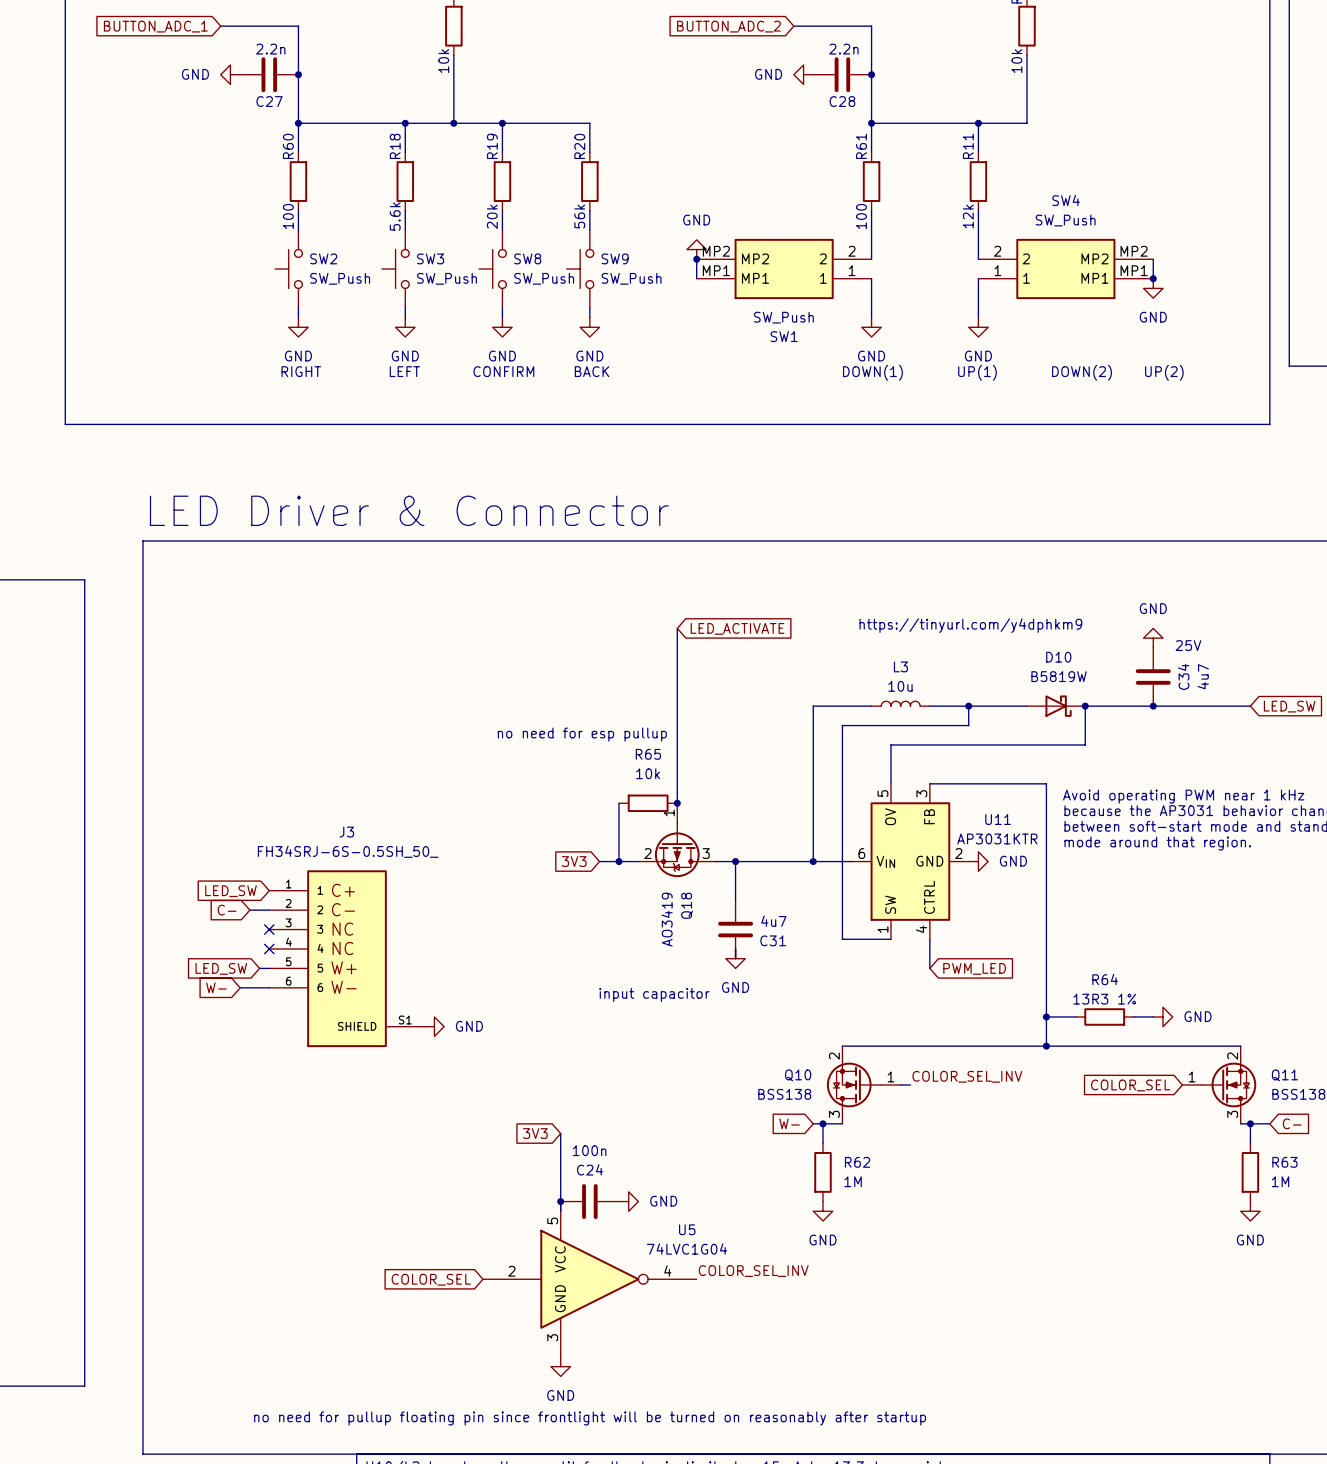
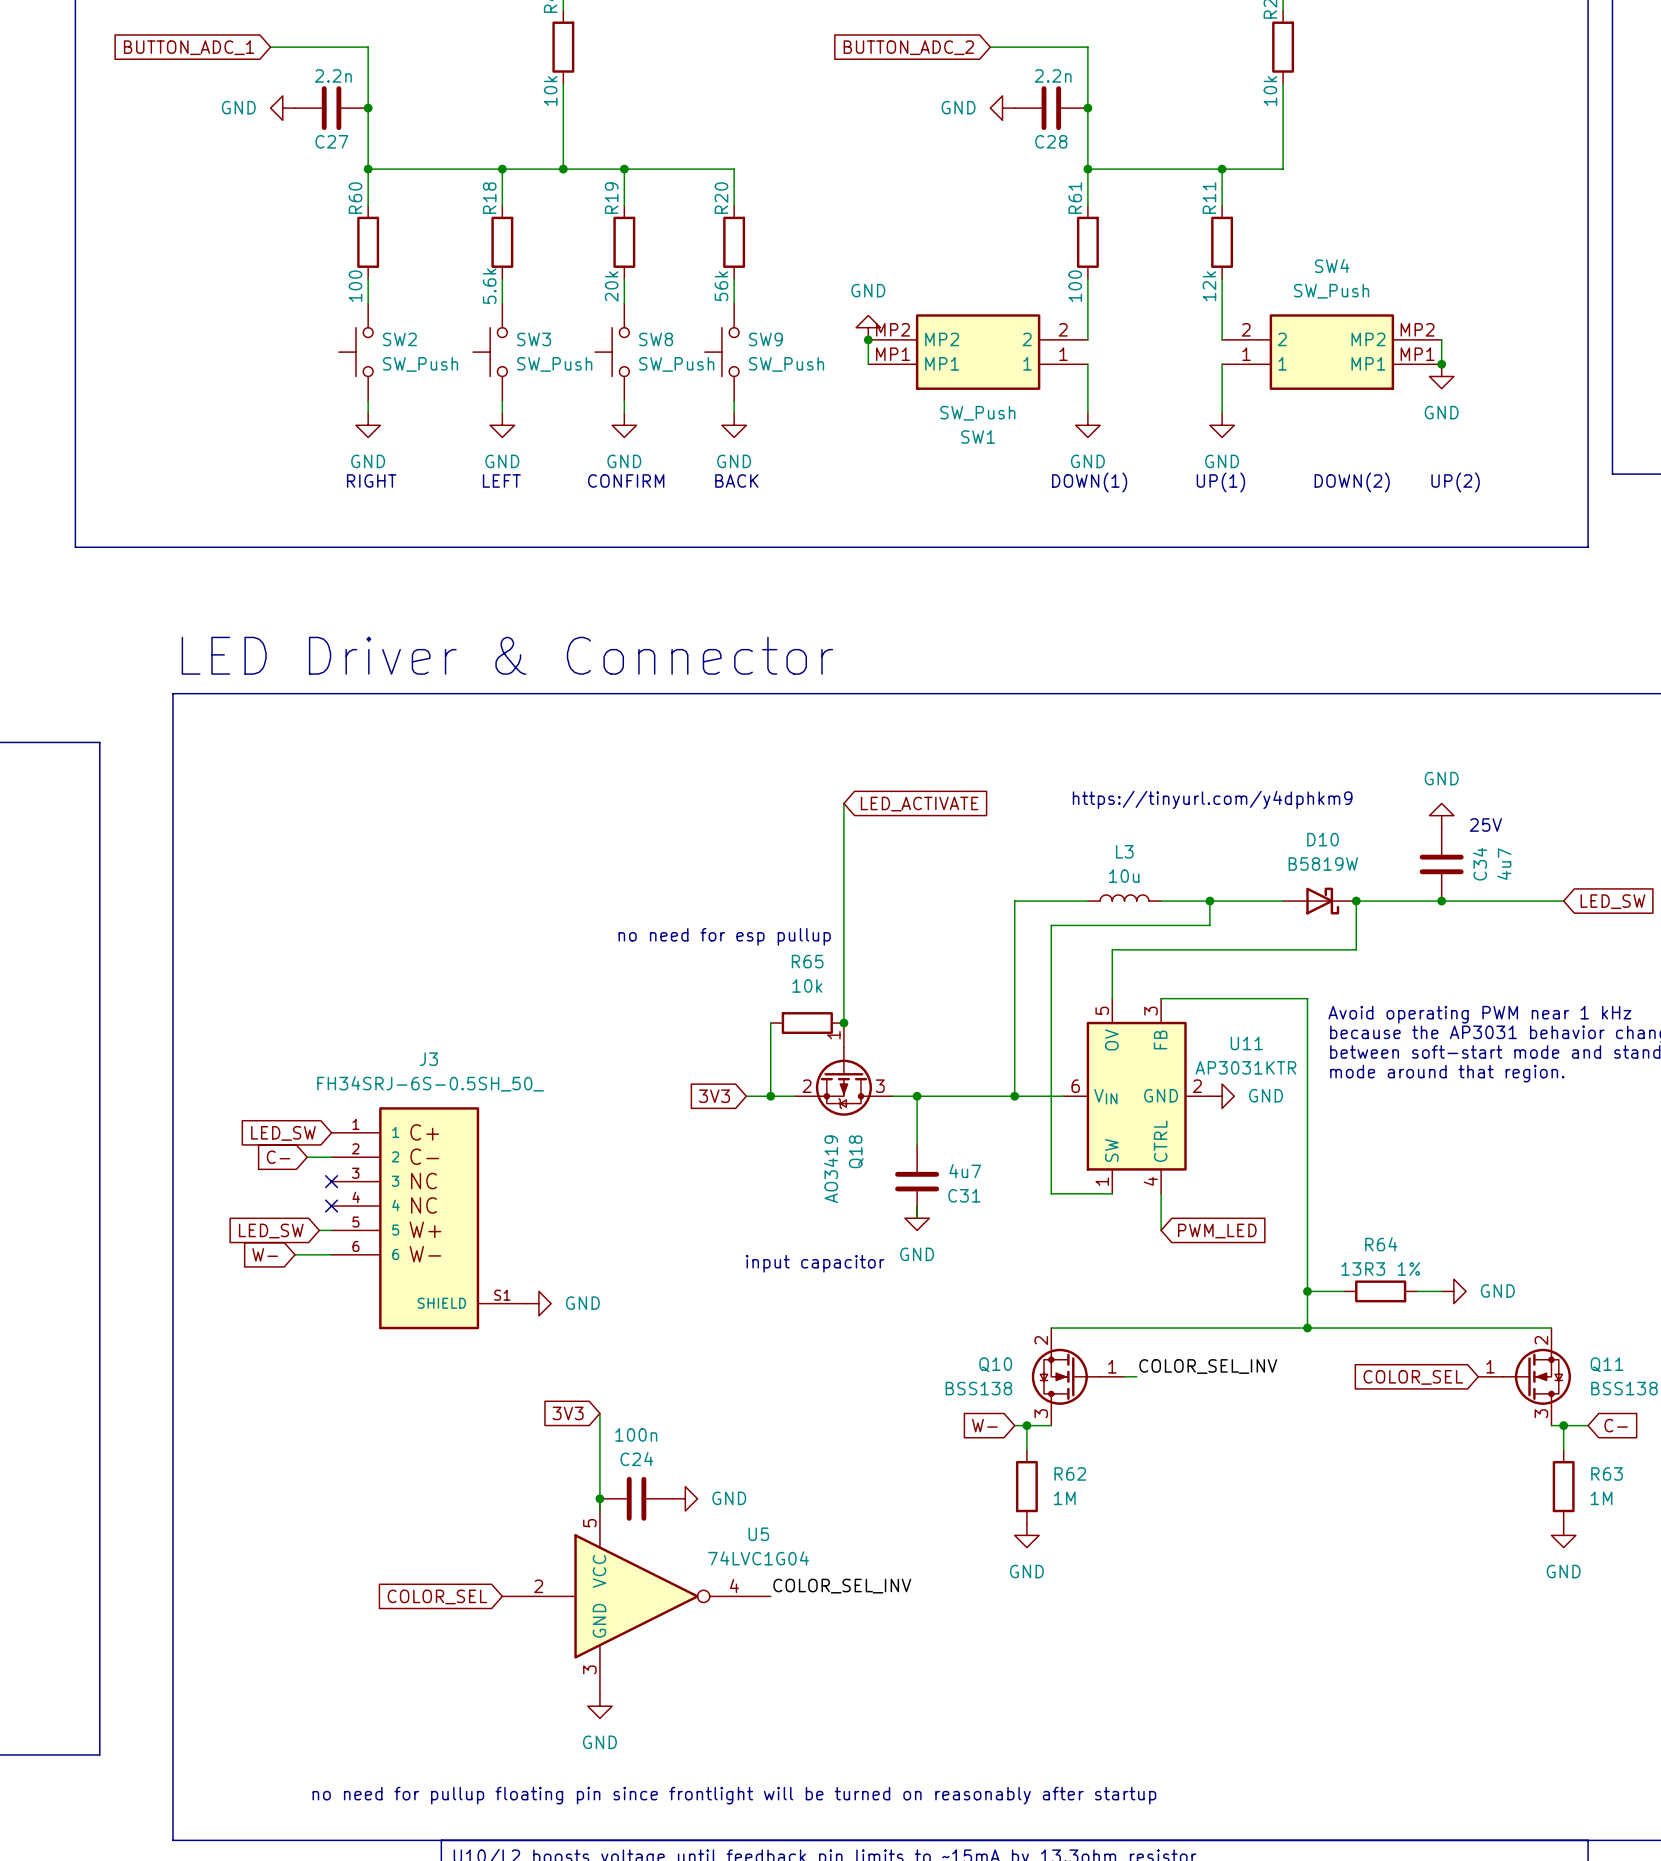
global label position: 3V3 (535, 1133) -> 3V3 (568, 1413)
wire: (560, 1133) (560, 1211) -> (599, 1413) (599, 1511)
junction: none -> (599, 1498)
junction: (560, 1201) -> none
C24 position: (589, 1201) -> (636, 1498)
power symbol position: GND (628, 1201) -> GND (685, 1498)
label position: COLOR_SEL_INV (753, 1271) -> COLOR_SEL_INV (842, 1586)
global label position: COLOR_SEL (431, 1279) -> COLOR_SEL (437, 1596)
U5 position: (589, 1279) -> (636, 1596)
power symbol position: GND (560, 1366) -> GND (599, 1706)

